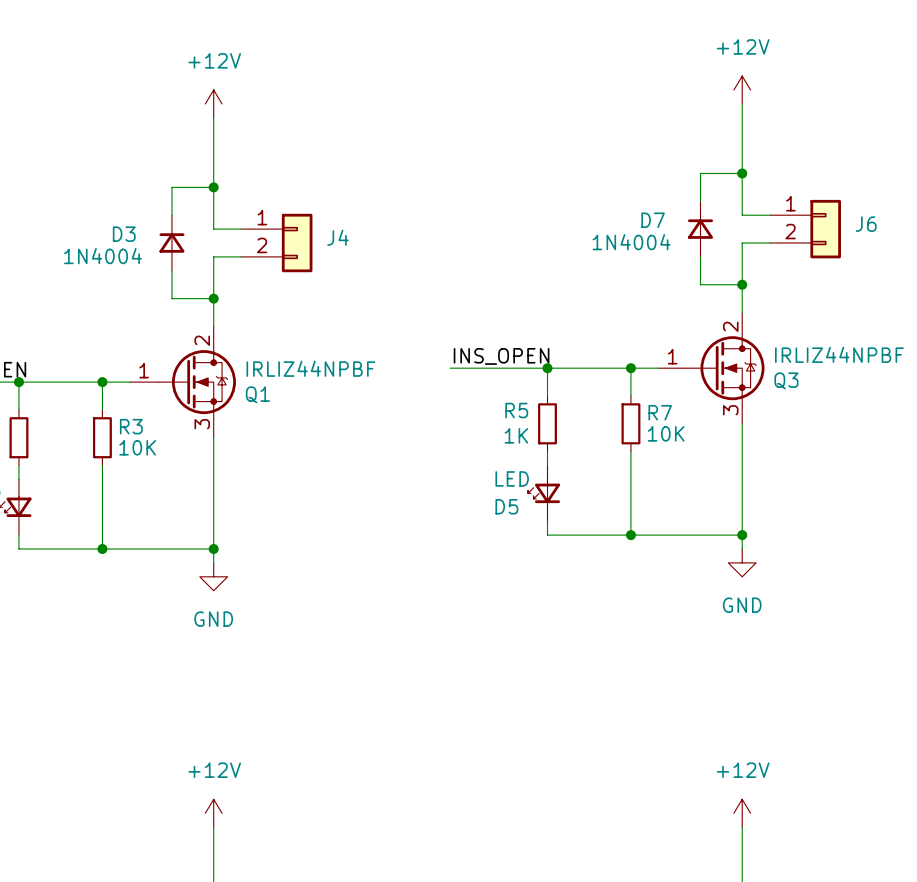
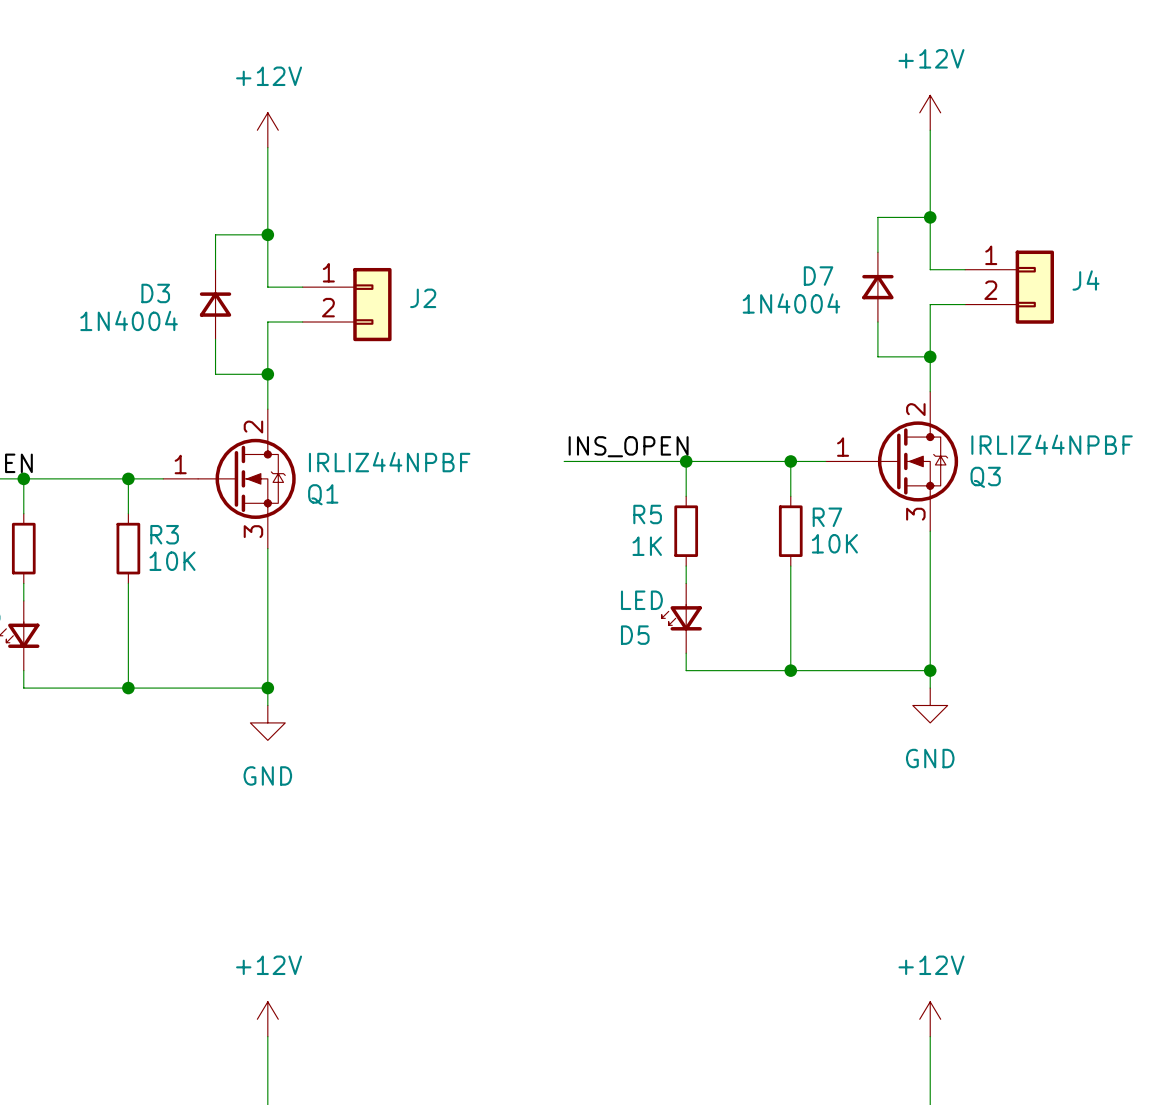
J6 name: J6 (866, 224) -> J4 (1086, 280)
J4 name: J4 (337, 237) -> J2 (423, 298)

